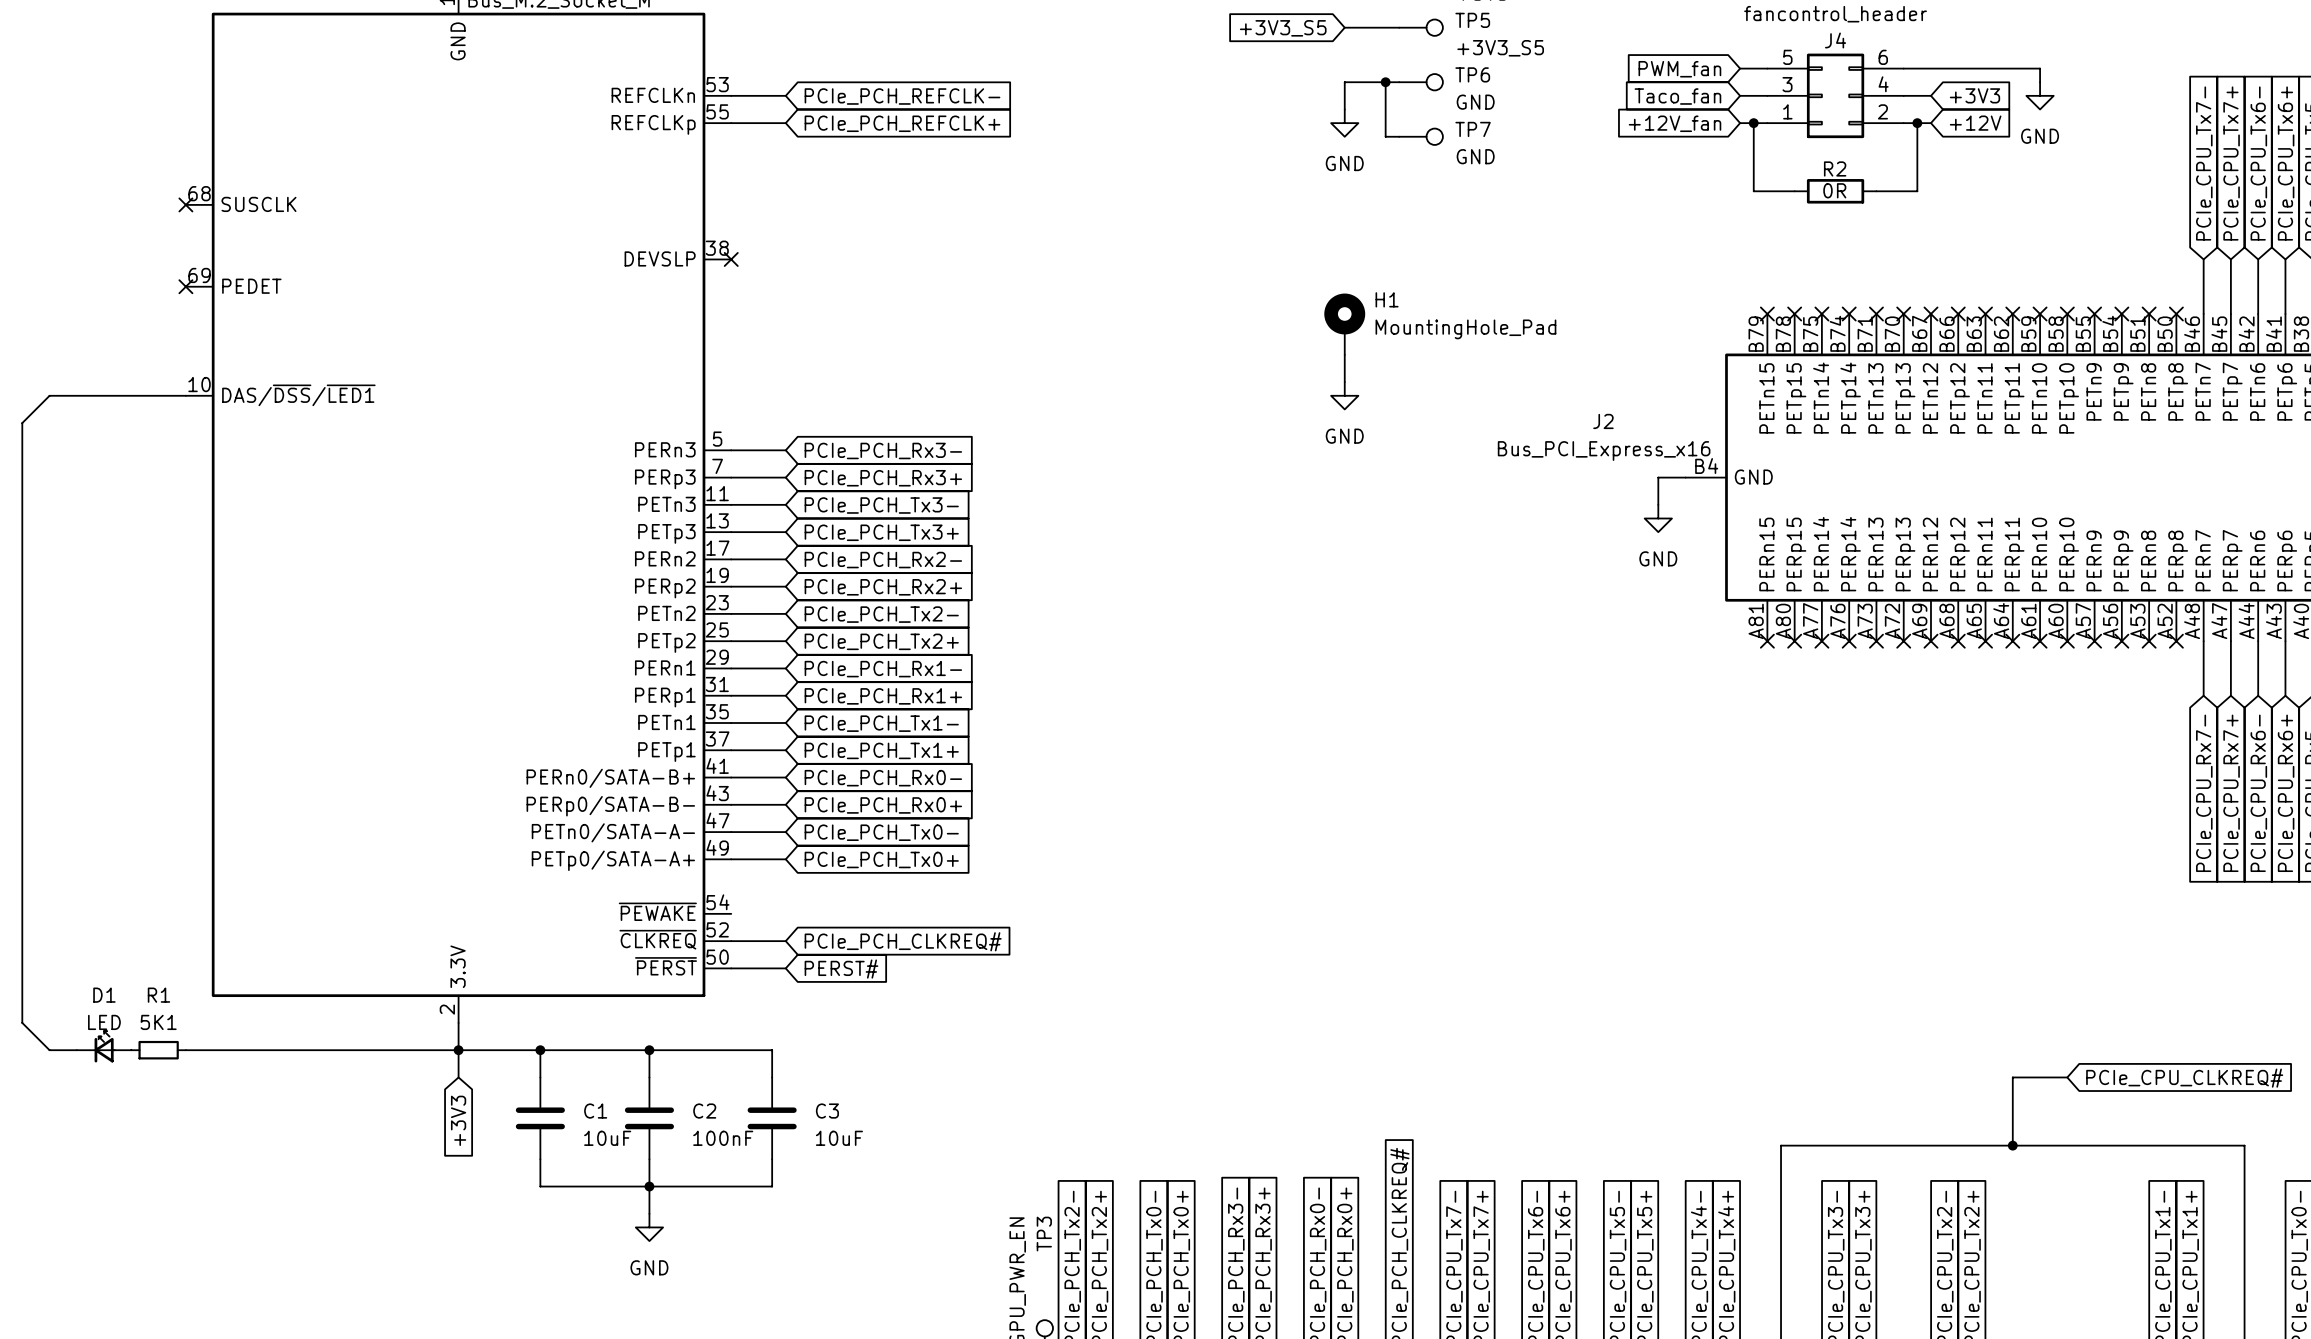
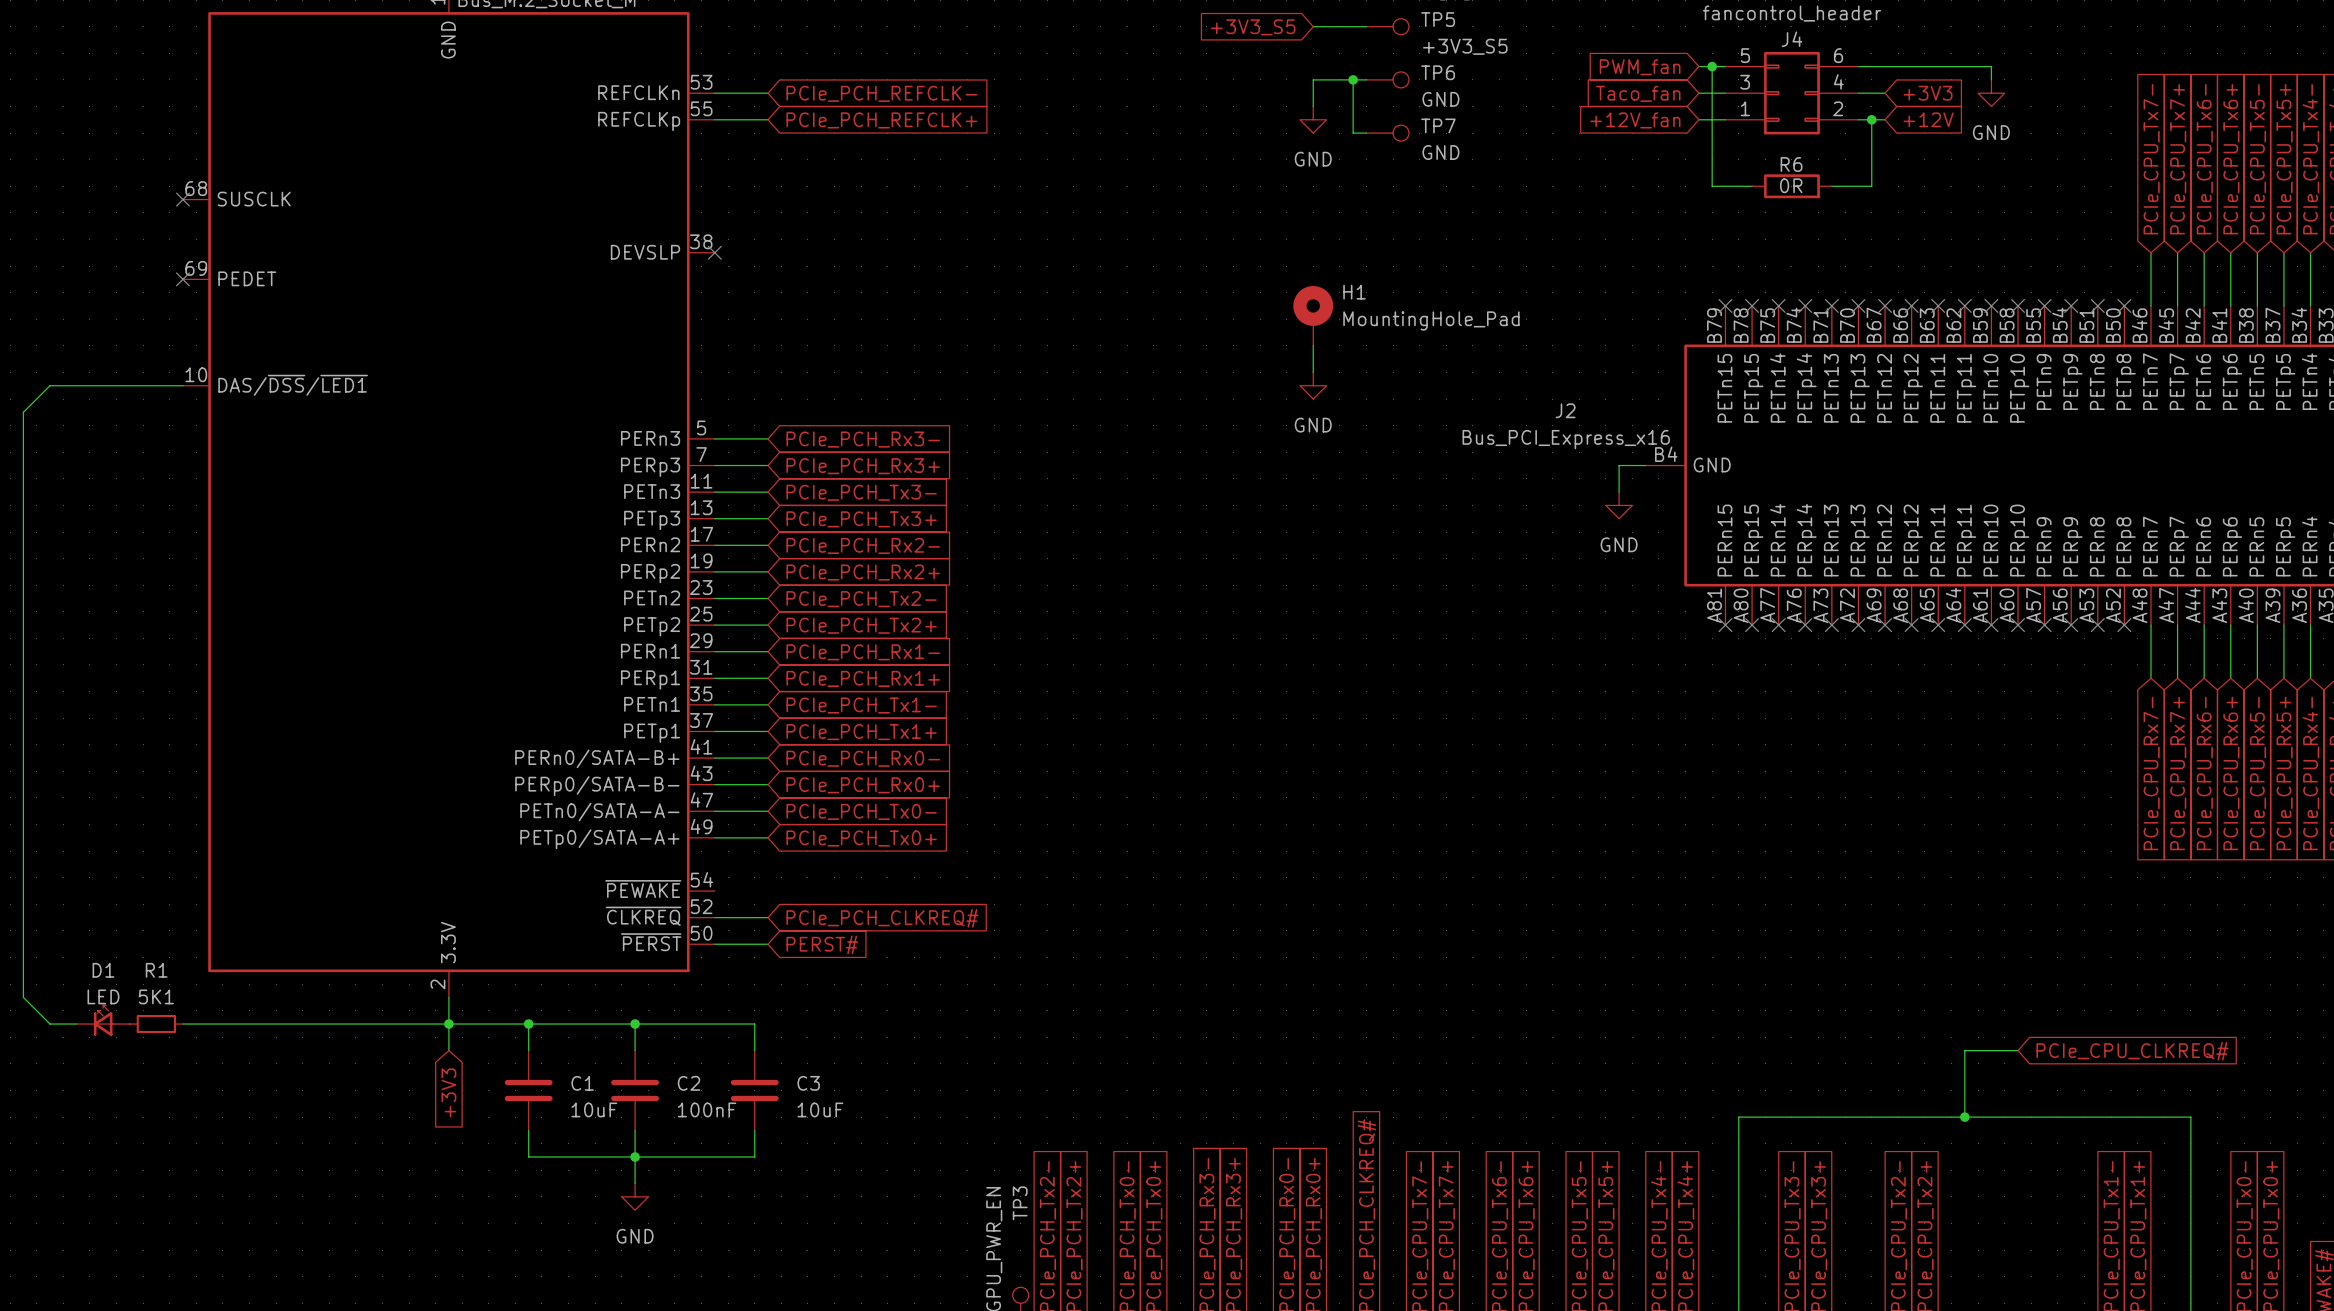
wire: none -> (1712, 66) (1712, 119)
junction position: (1753, 123) -> (1712, 66)
R2 name: R2 (1835, 168) -> R6 (1791, 164)

